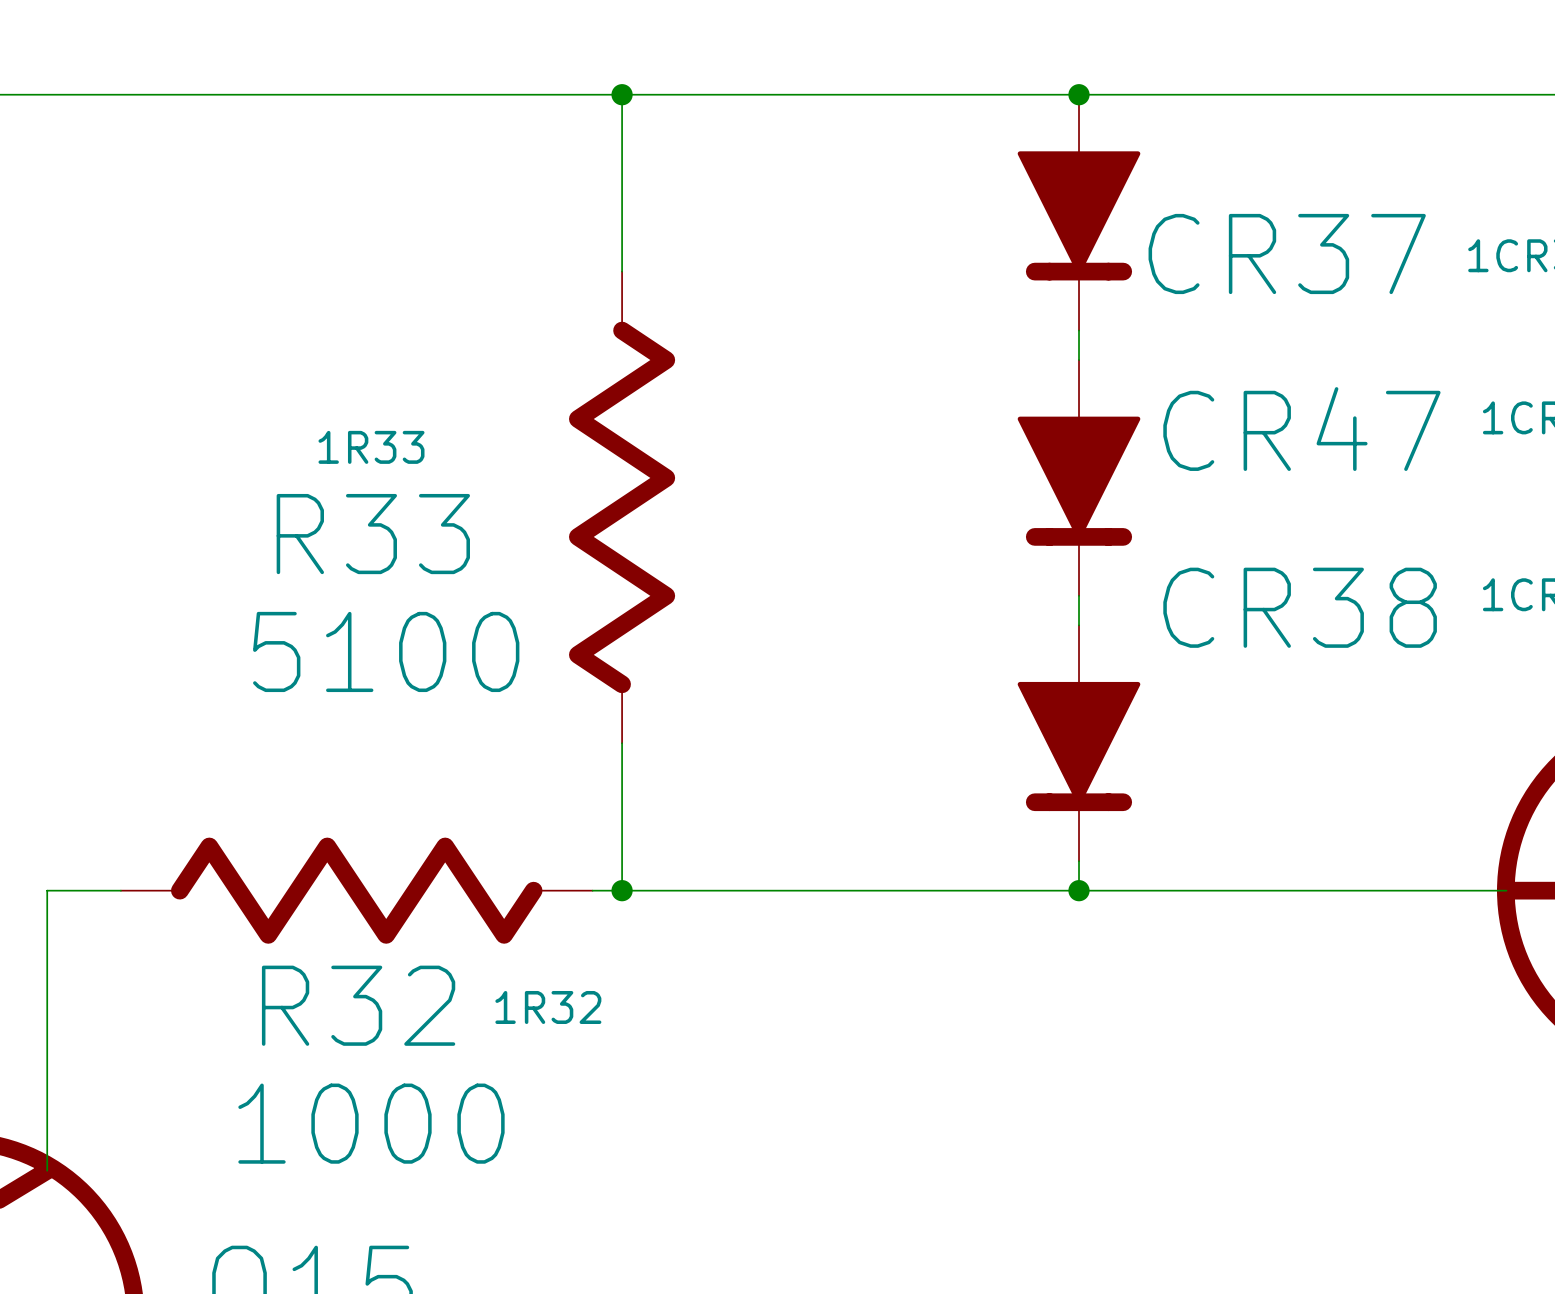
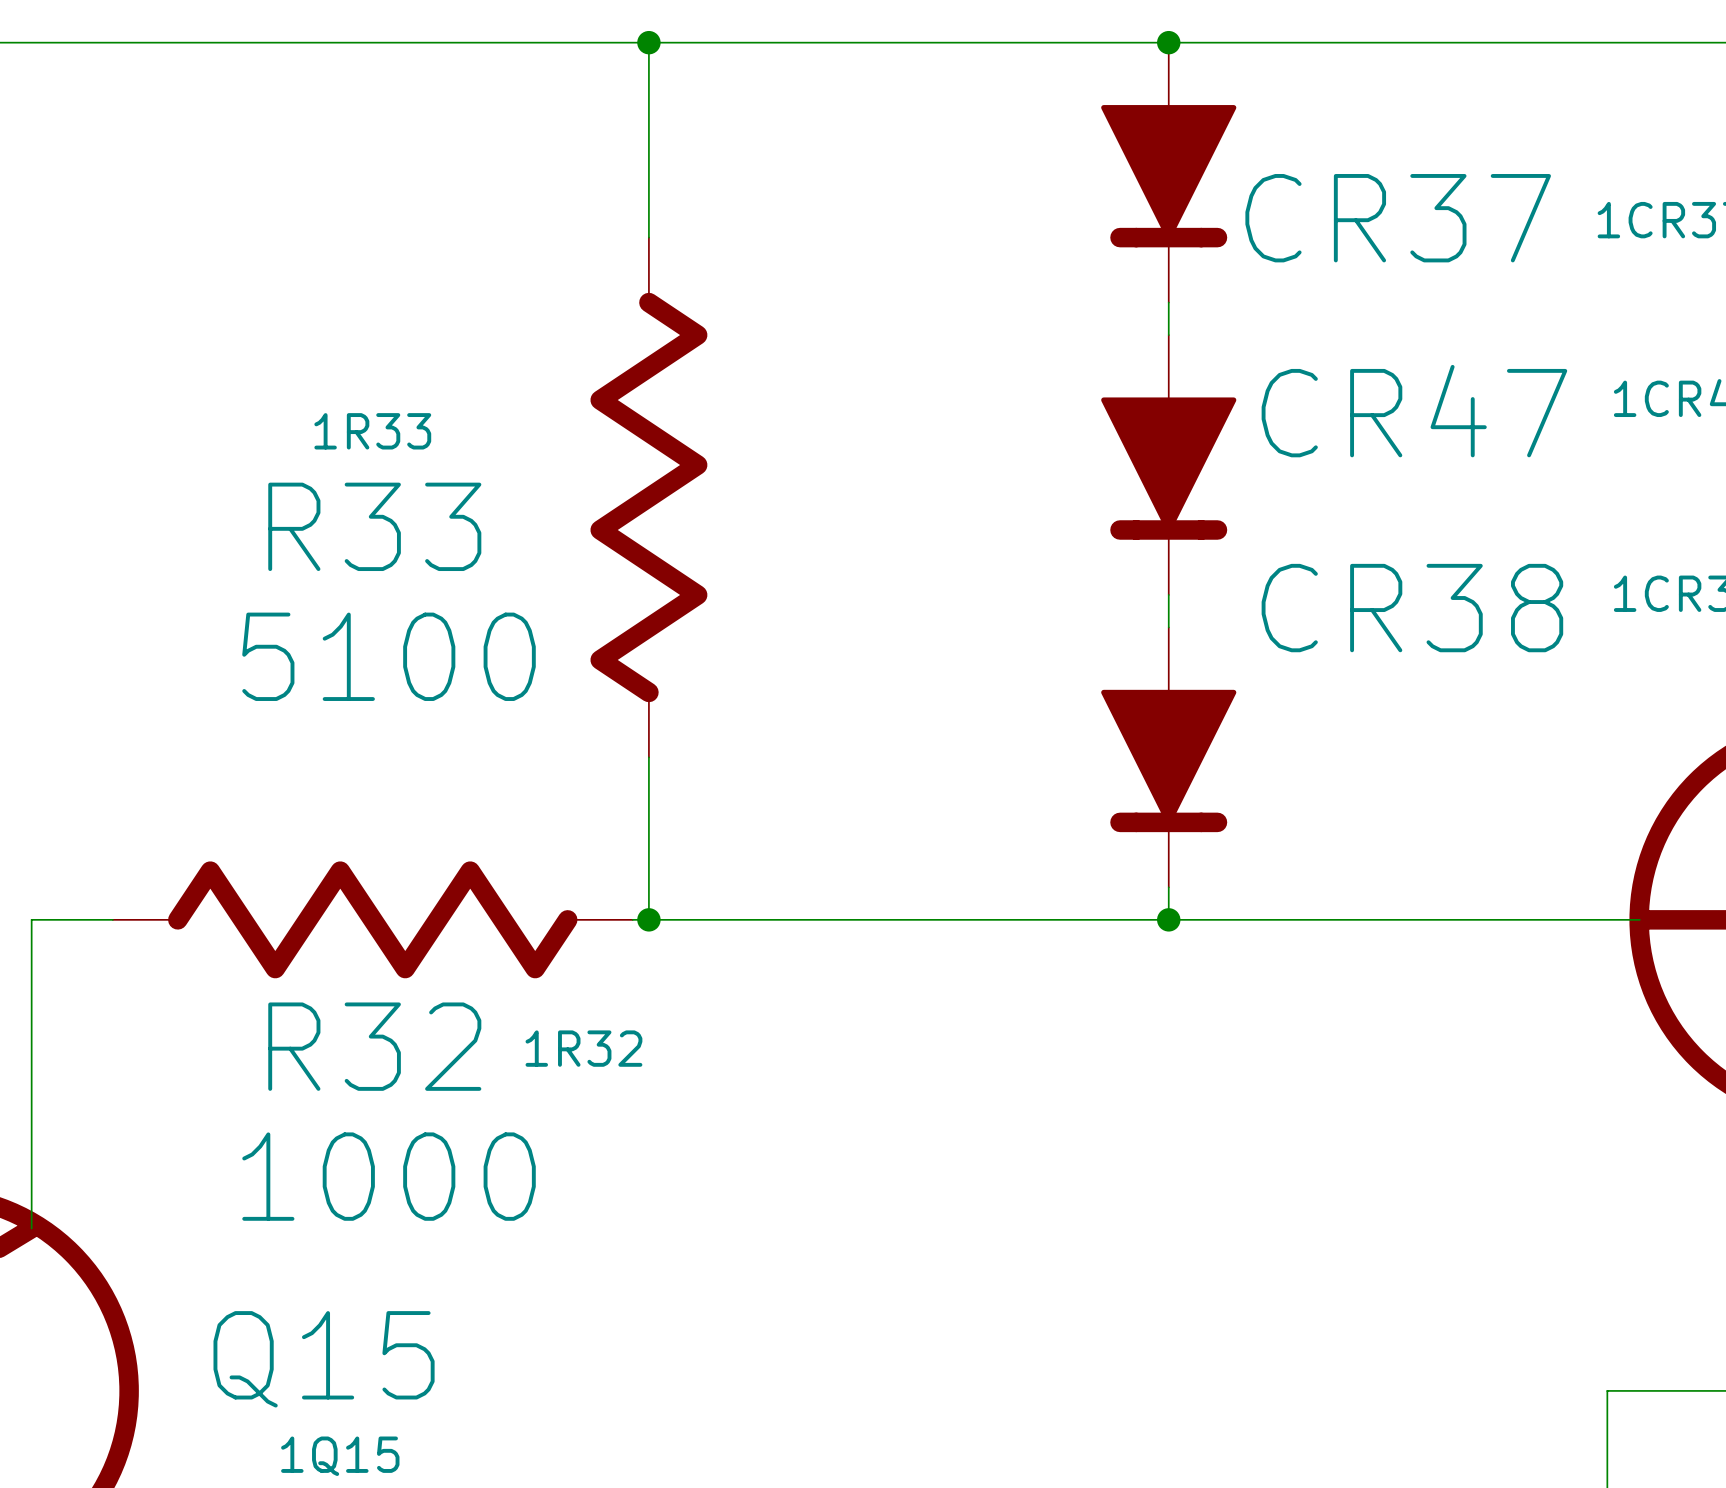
wire: (622, 94) (622, 271) -> (648, 42) (648, 237)
junction position: (622, 94) -> (648, 42)
1R33 position: (622, 507) -> (648, 497)
wire: (622, 743) (622, 890) -> (648, 757) (648, 919)
junction position: (622, 890) -> (648, 919)

